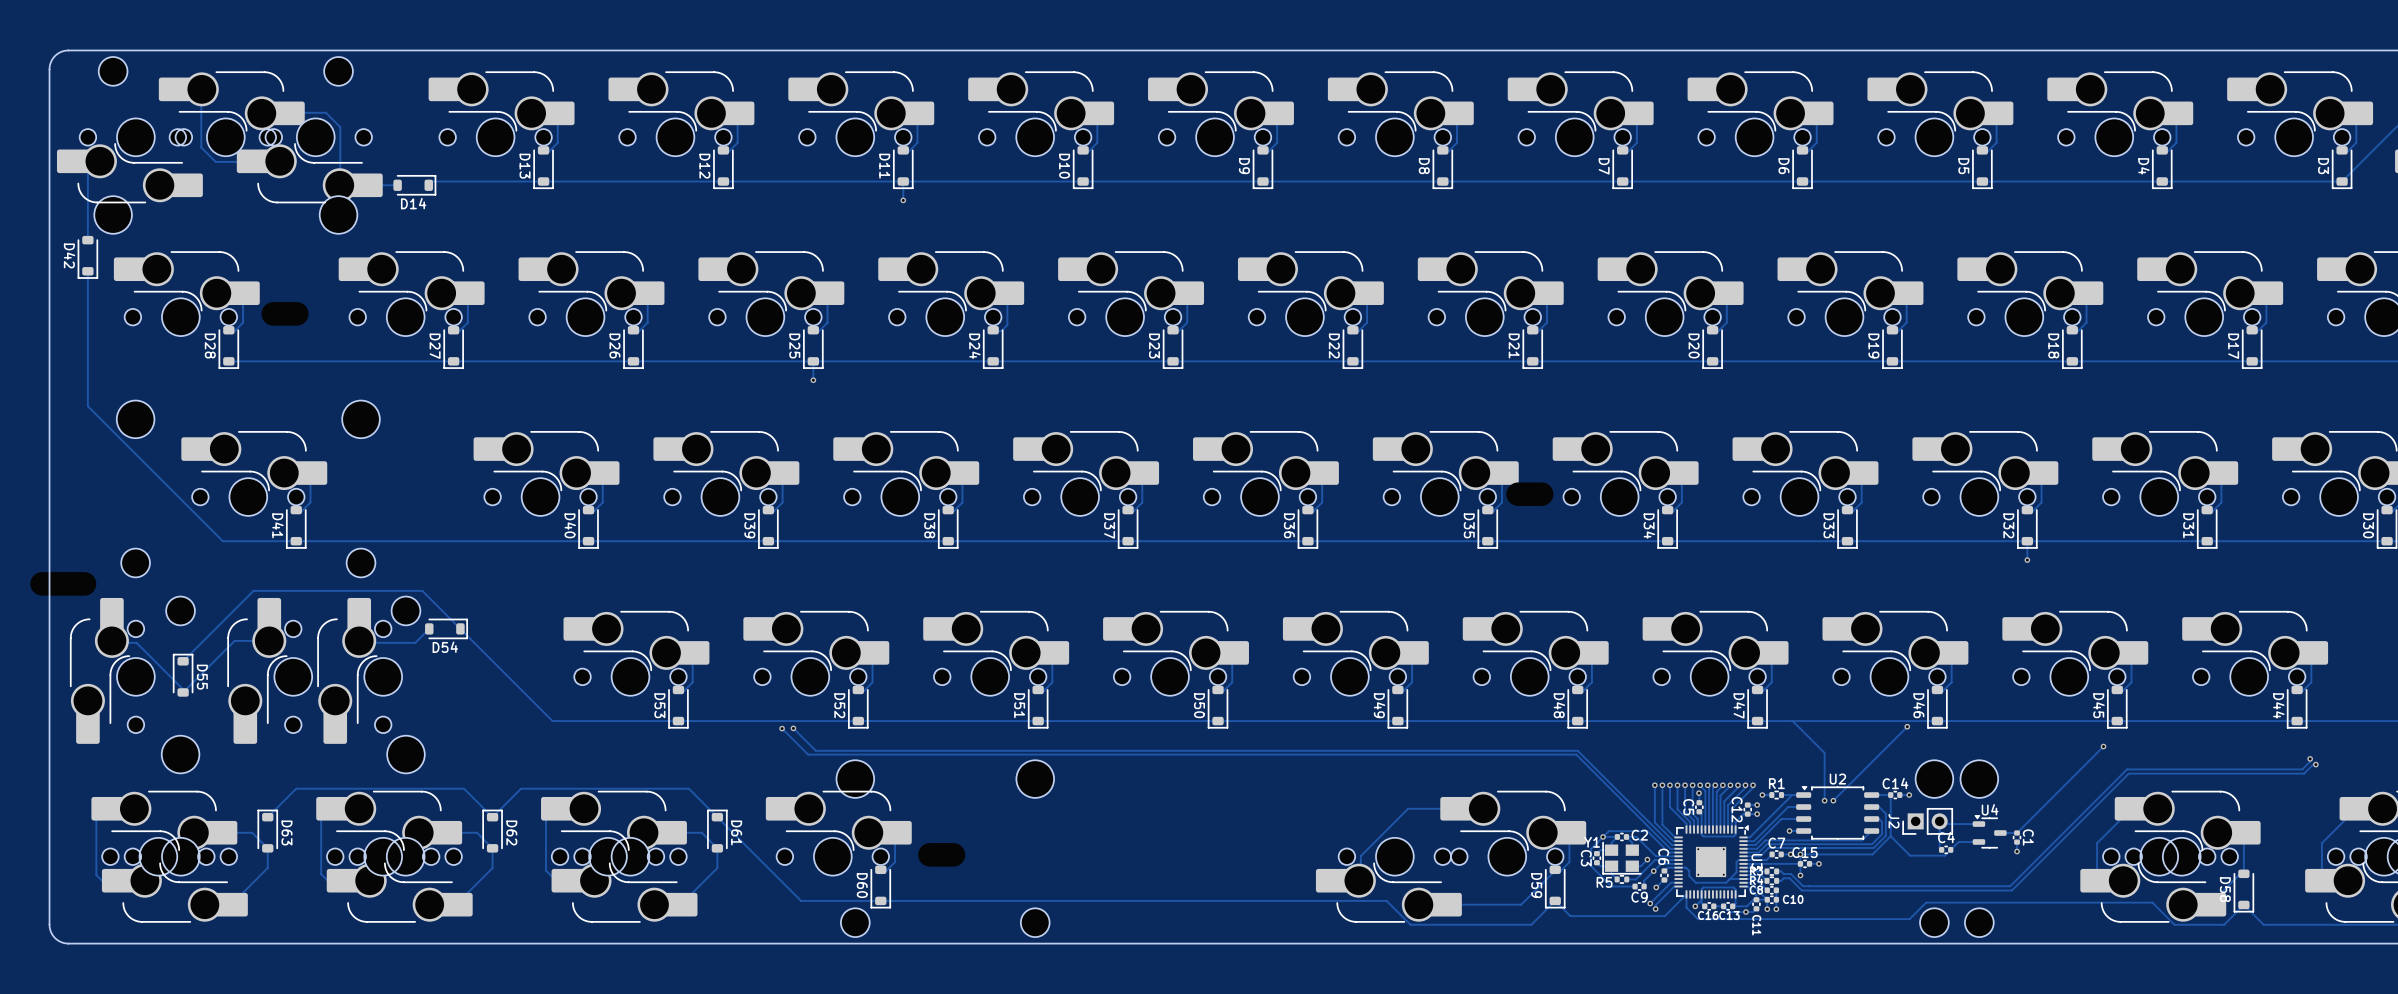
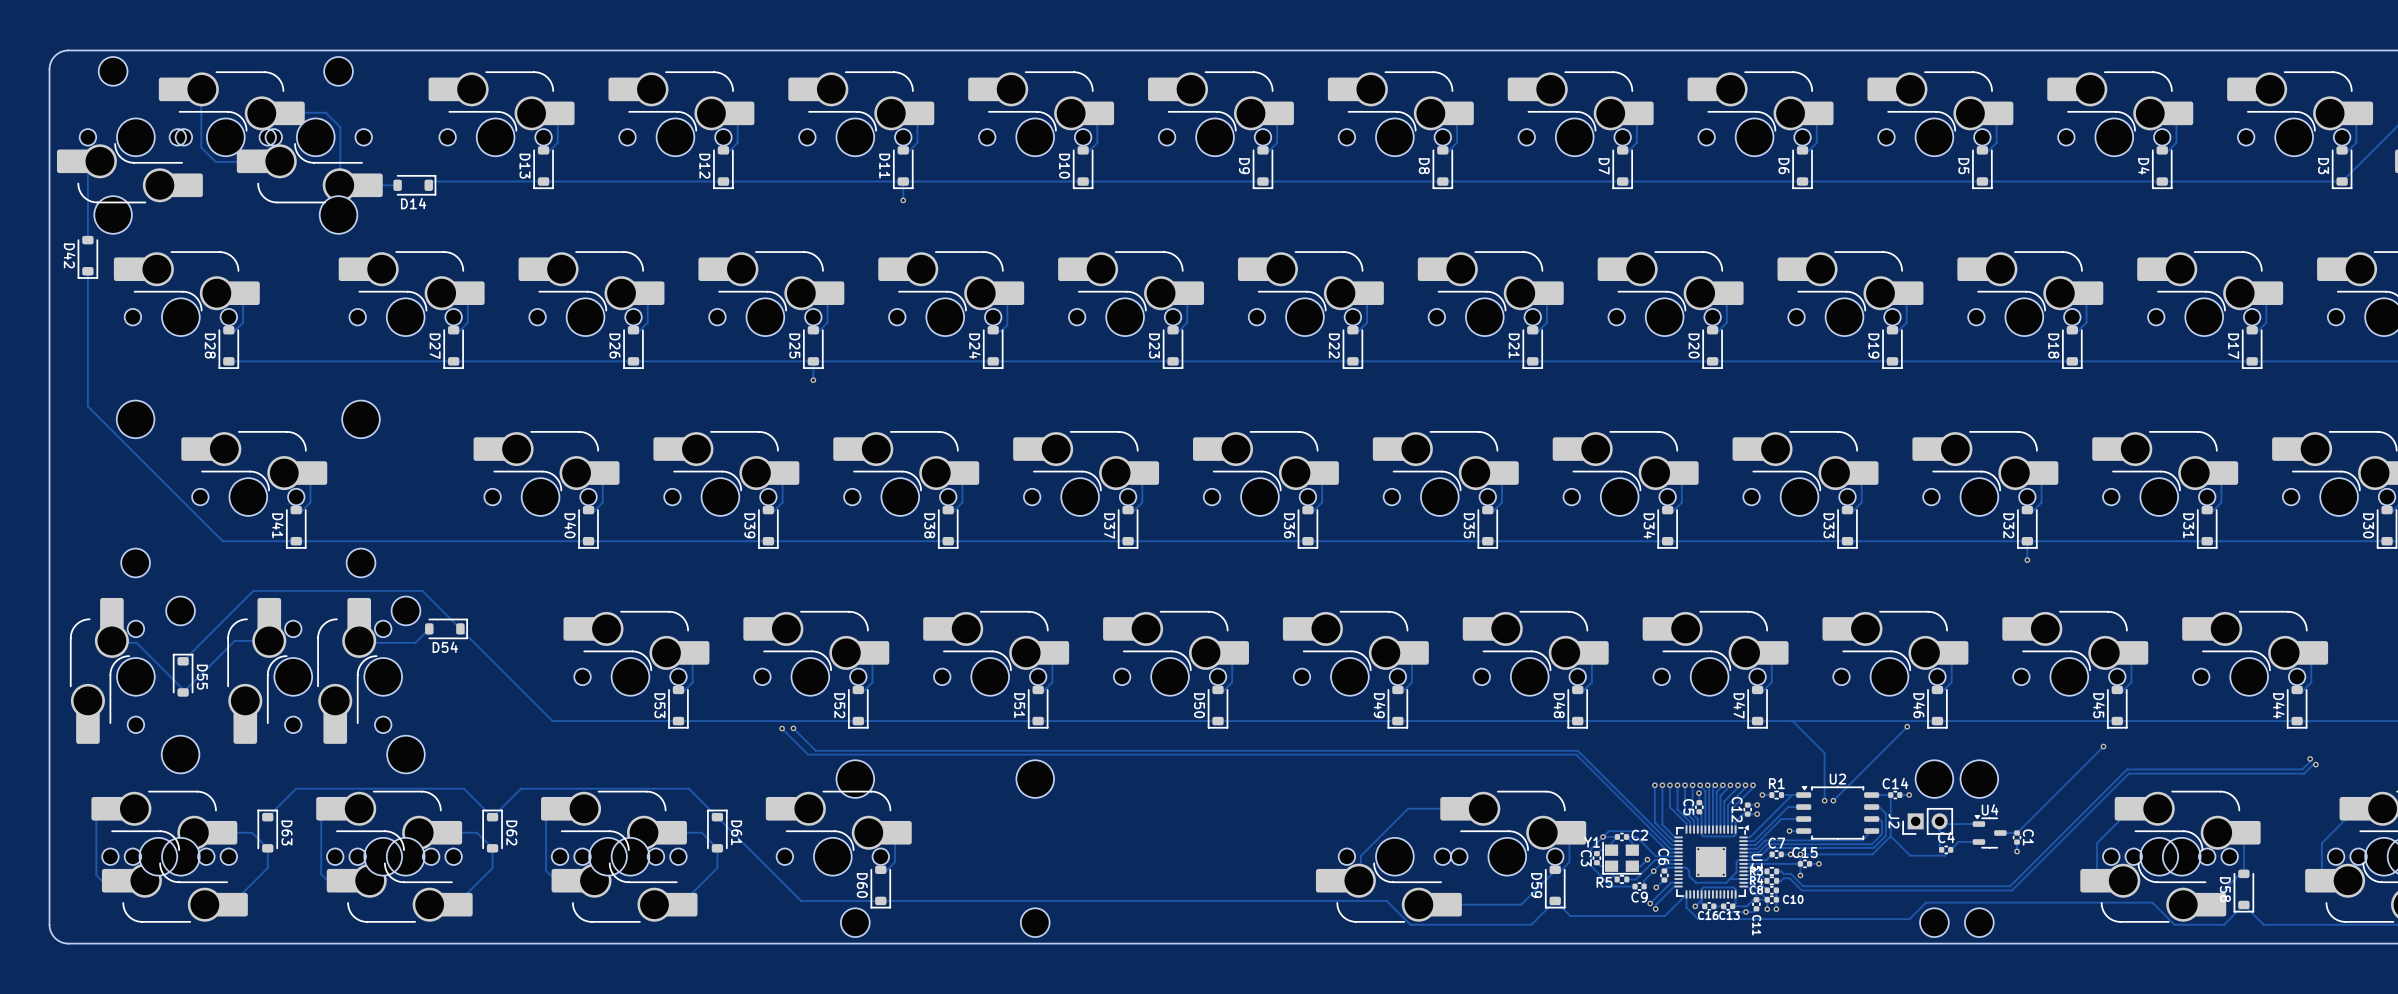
part: (285, 313) -> none
part: (1529, 494) -> none
part: (63, 583) -> none
part: (941, 854) -> none

